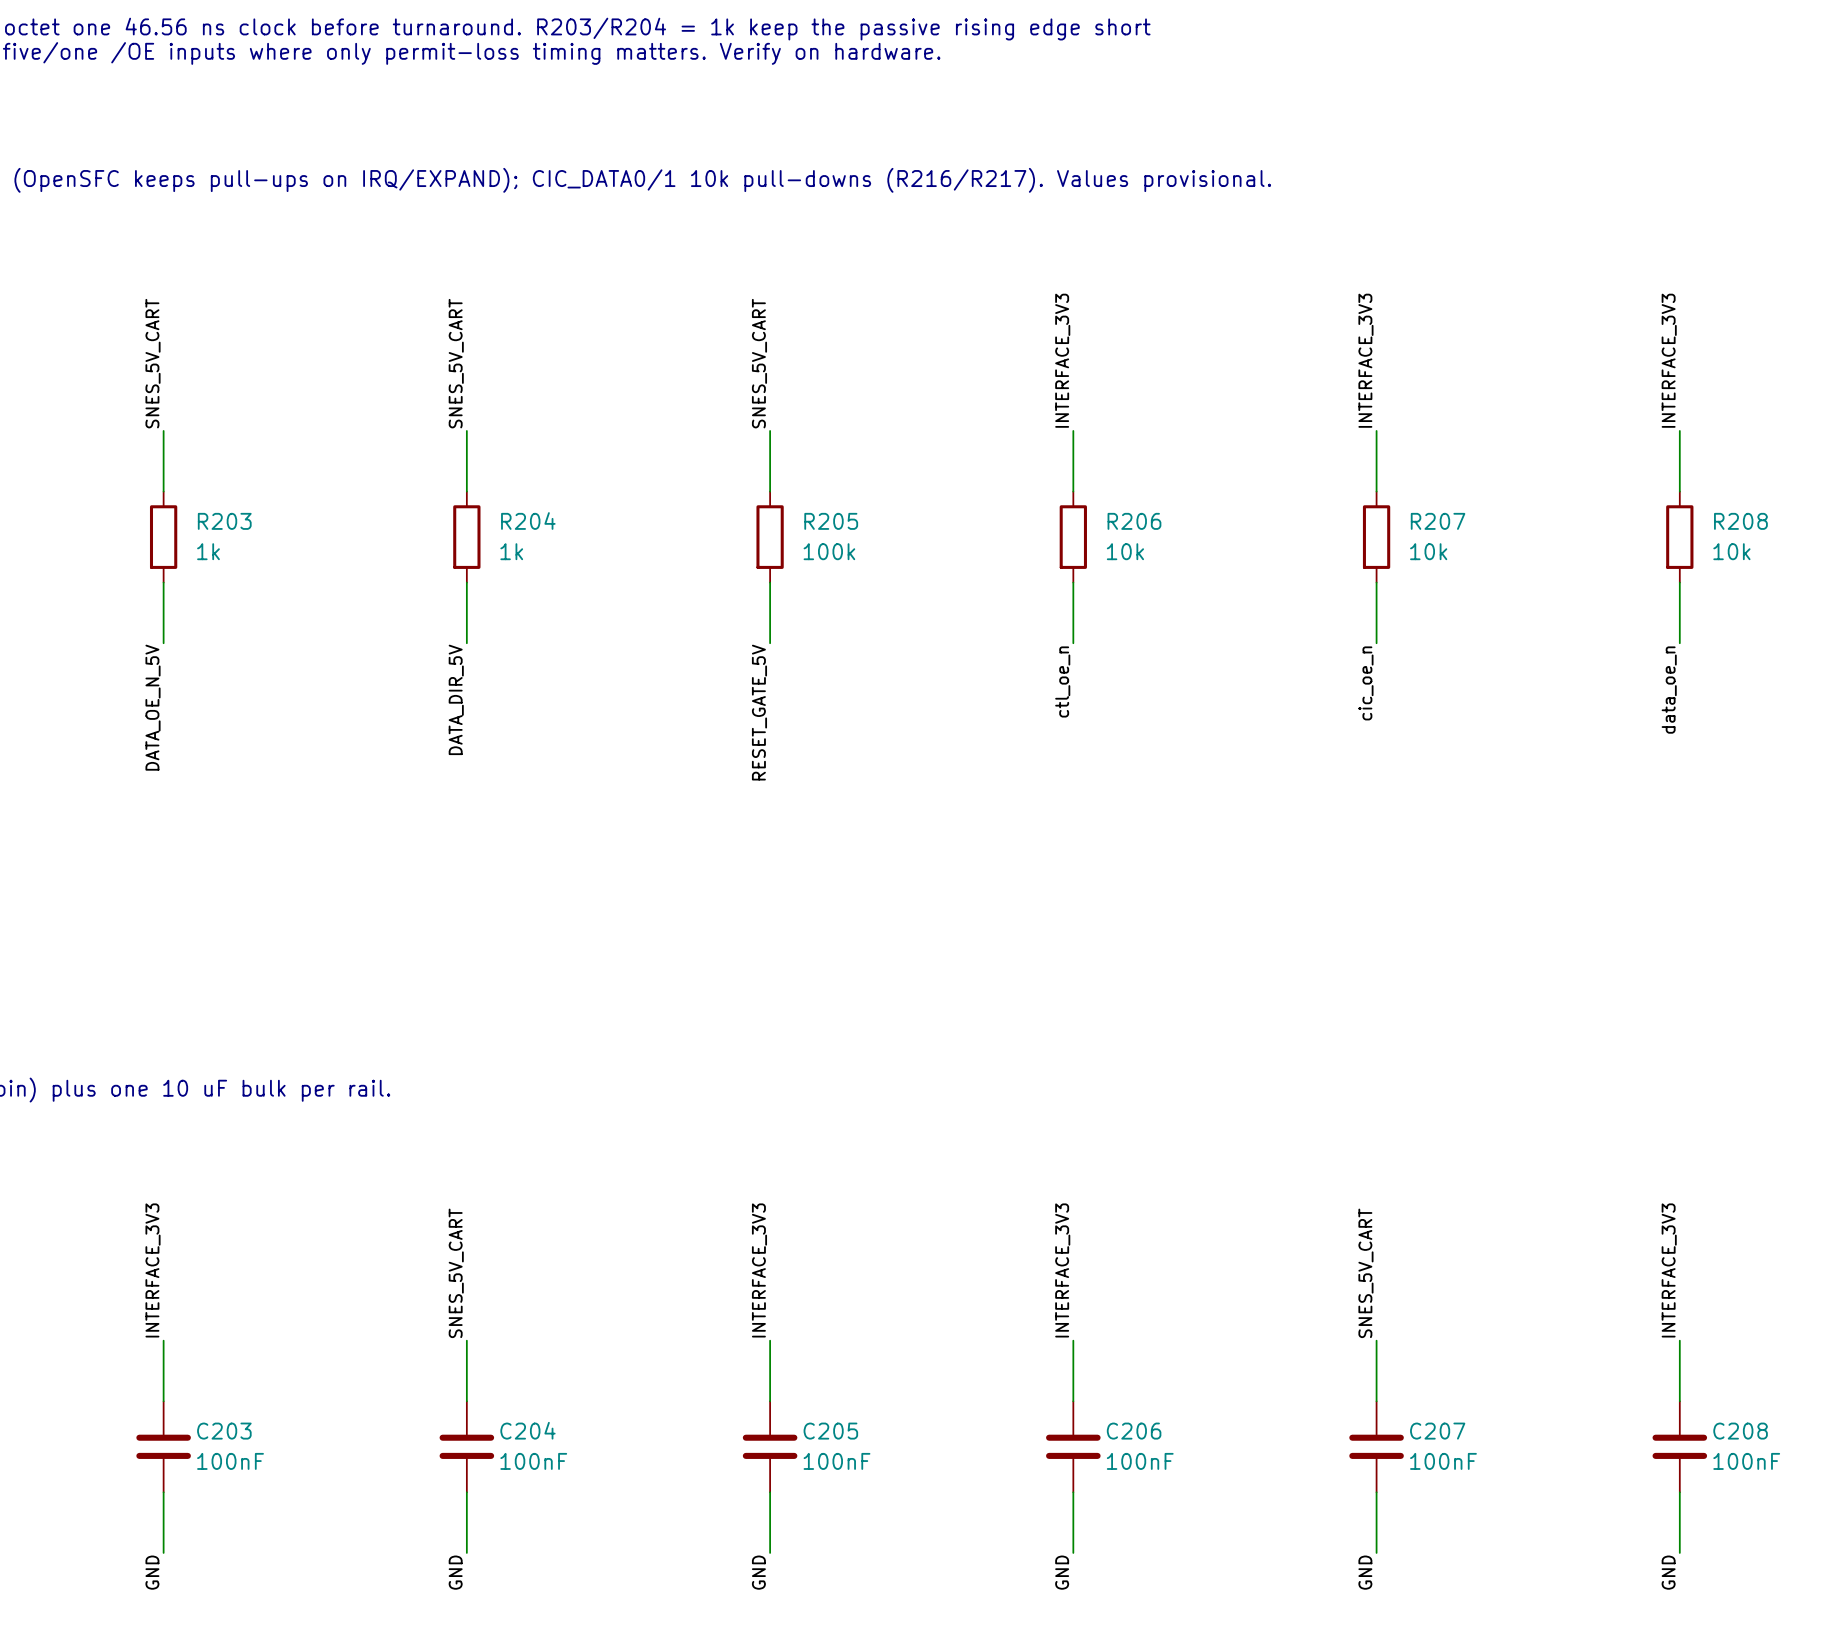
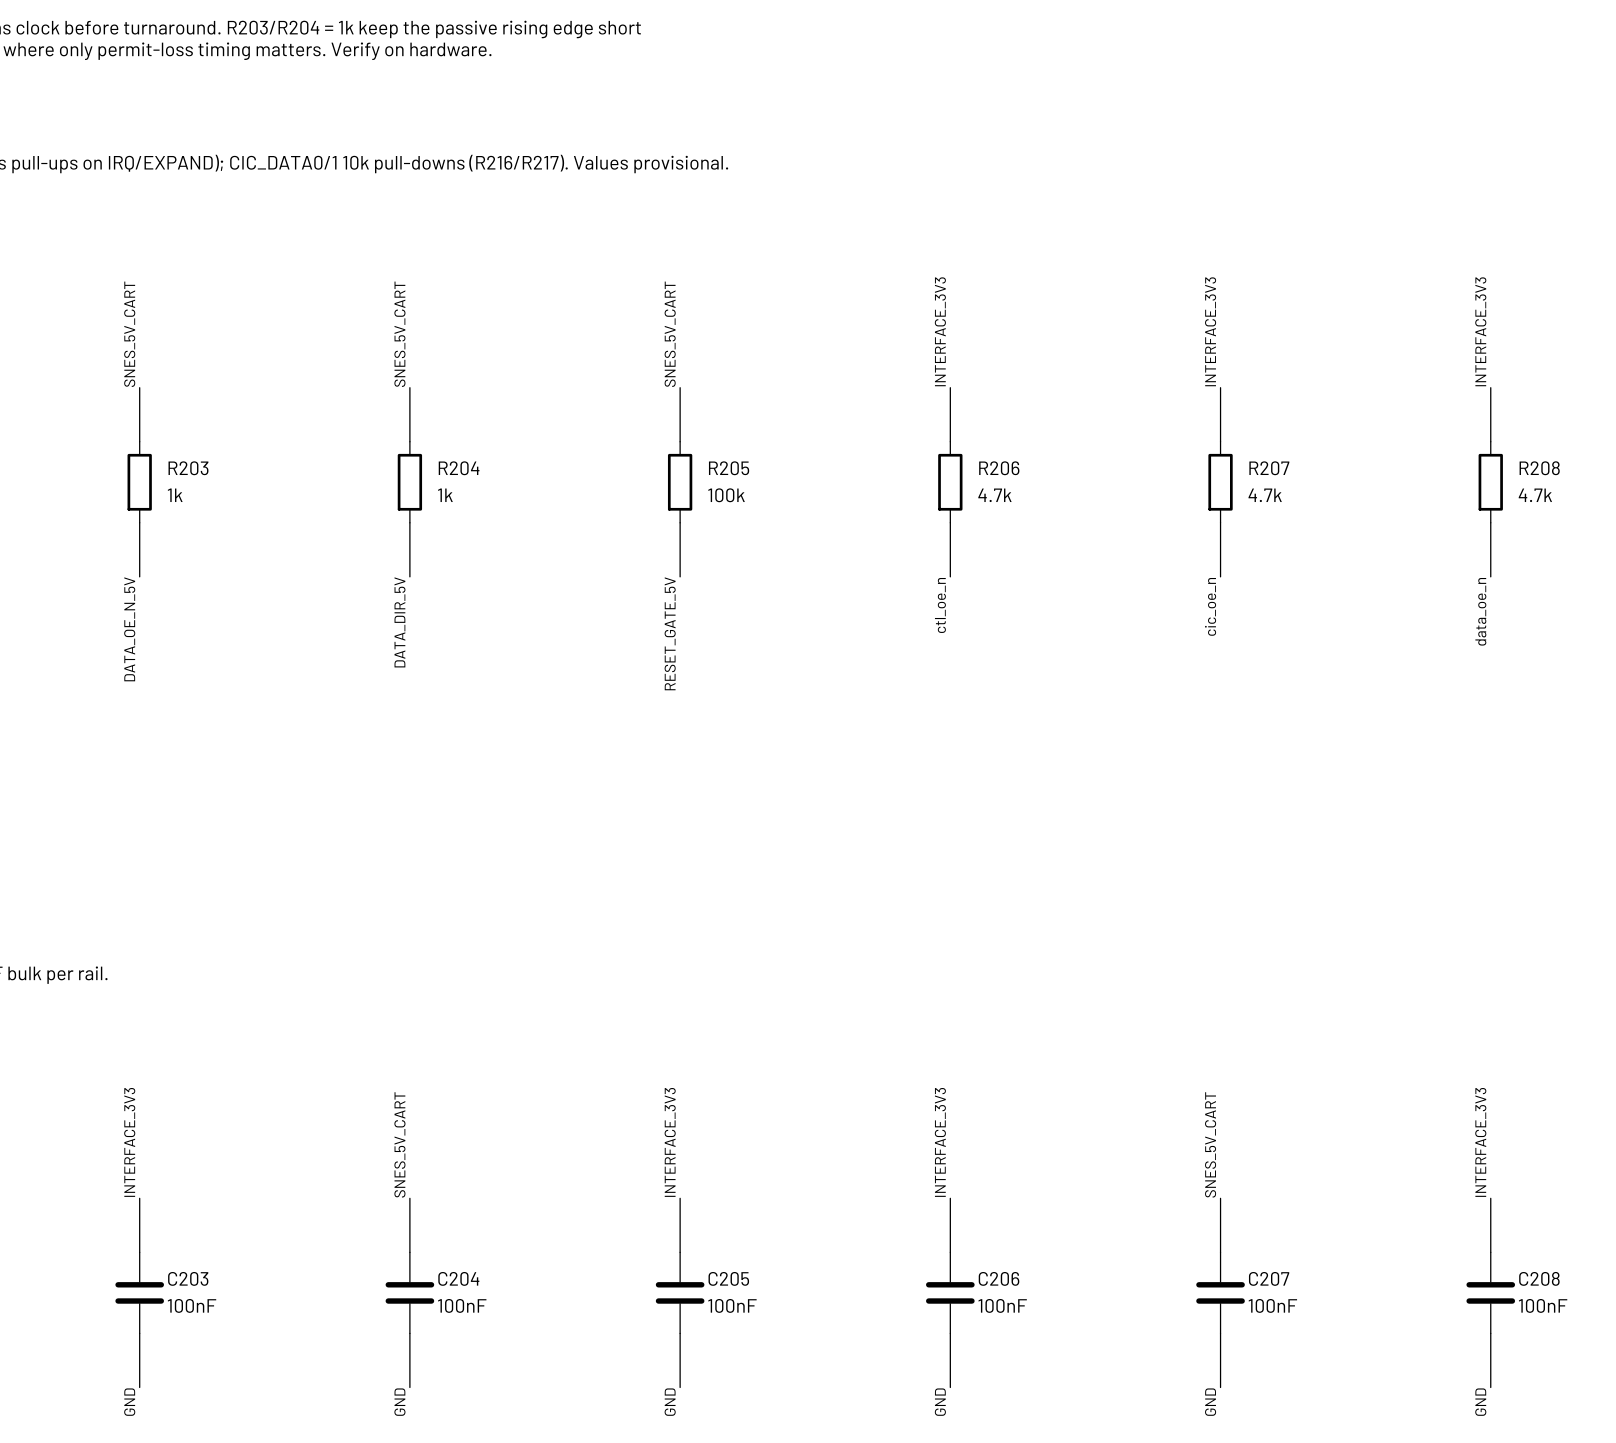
R206 value: 10k (1125, 551) -> 4.7k (994, 495)
R207 value: 10k (1428, 551) -> 4.7k (1265, 495)
R208 value: 10k (1731, 551) -> 4.7k (1535, 495)

